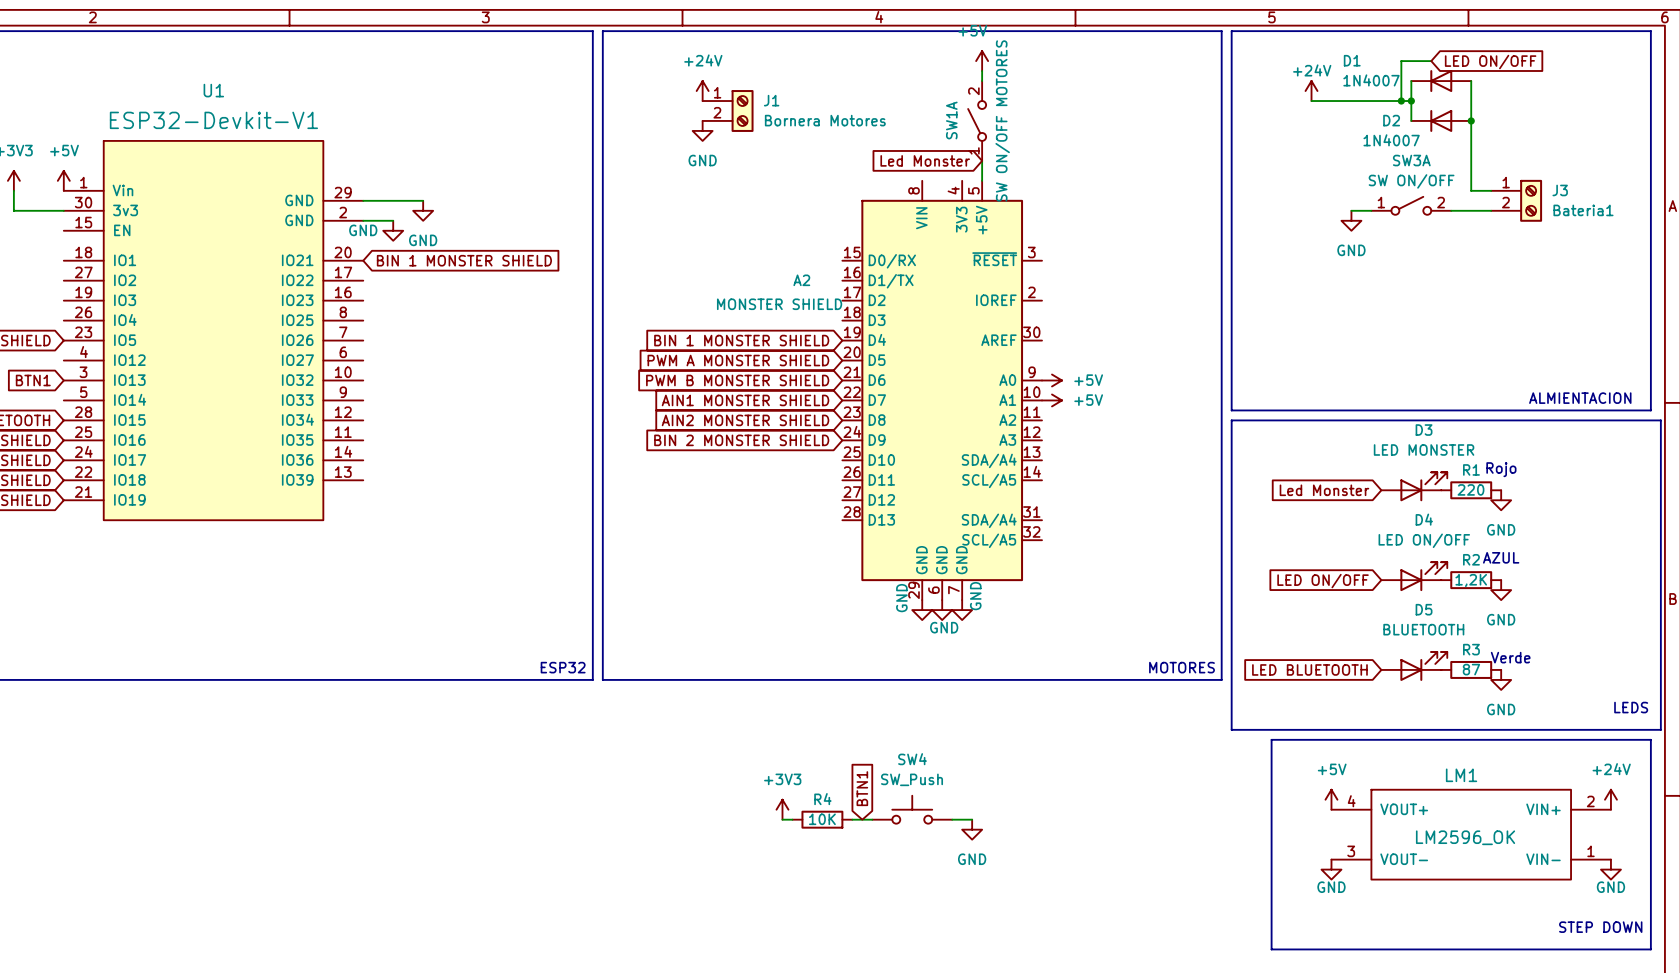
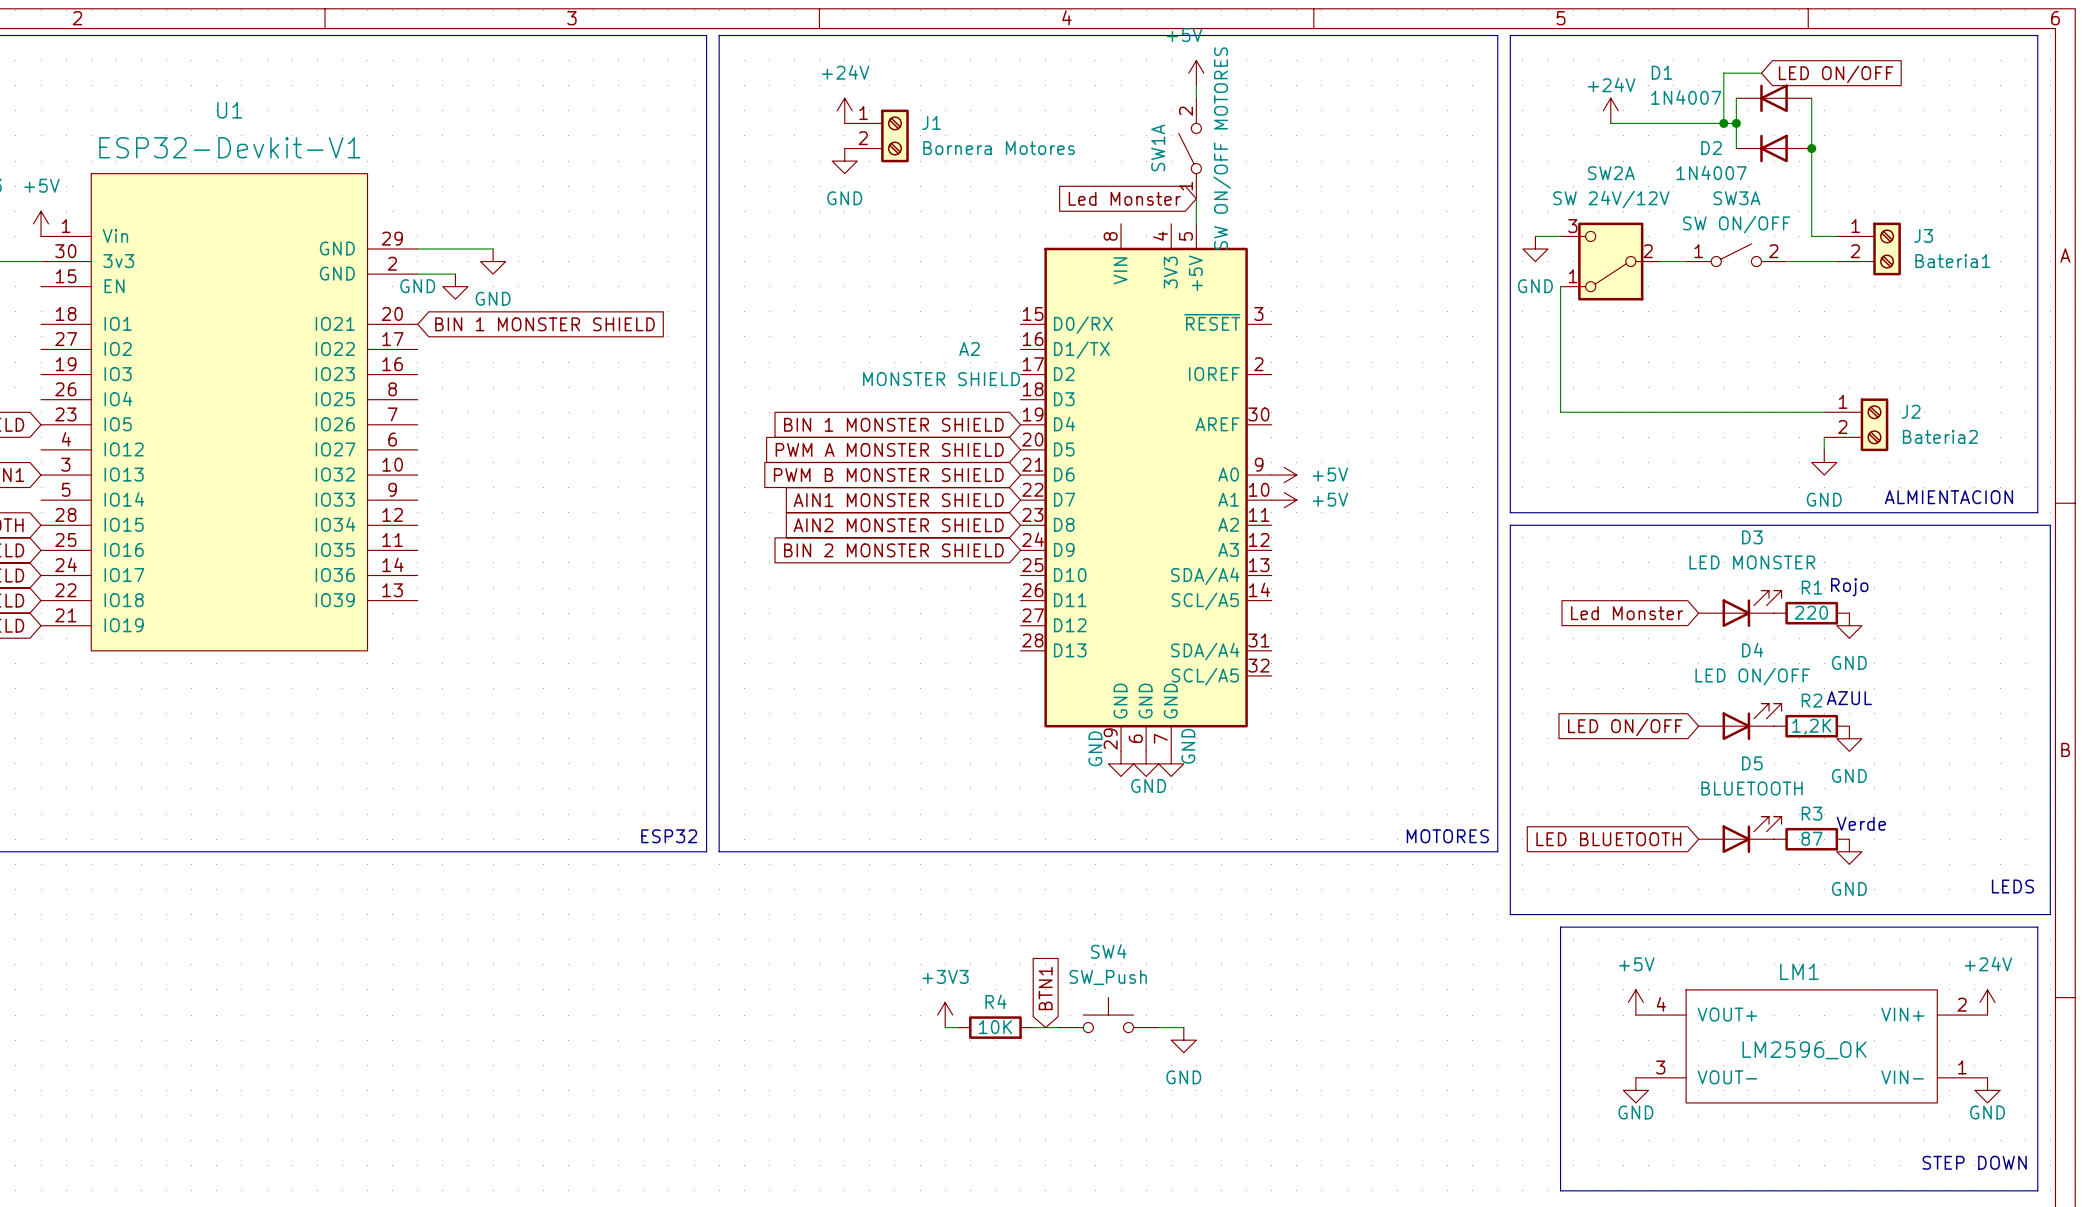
wire: none -> (1535, 236) (1560, 236)
power symbol: none -> GND (1535, 248)
SW2A: none -> SW 24V/12V (1610, 261)
power symbol: GND (1351, 220) -> none
wire: none -> (1560, 286) (1560, 412) (1824, 412)
J2: none -> Bateria2 (1856, 424)
wire: none -> (1824, 437) (1824, 449)
power symbol: none -> GND (1824, 462)

